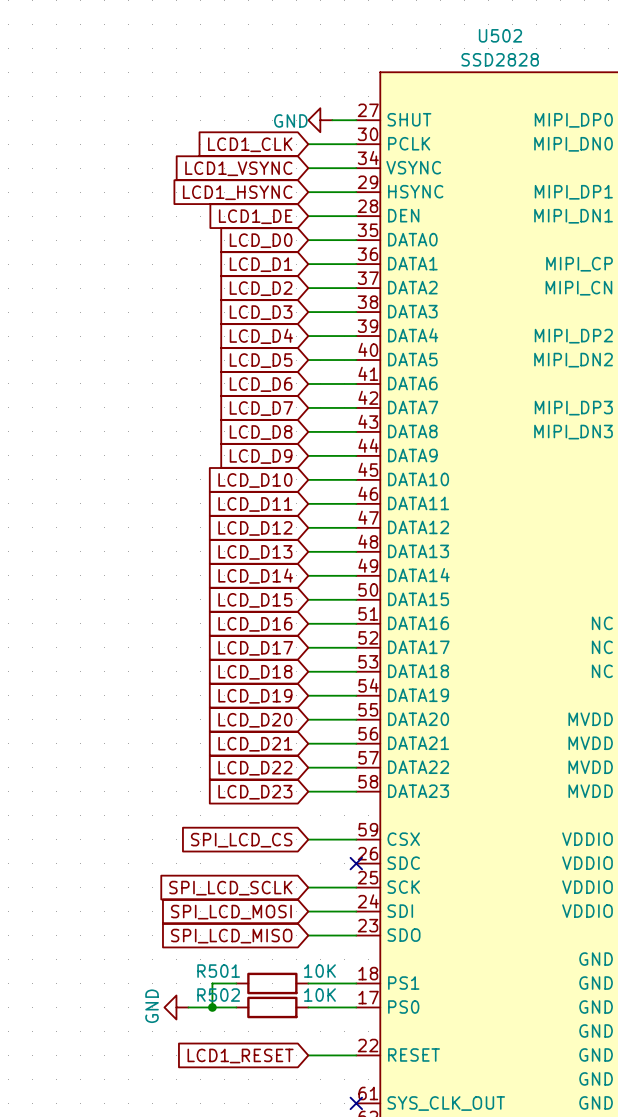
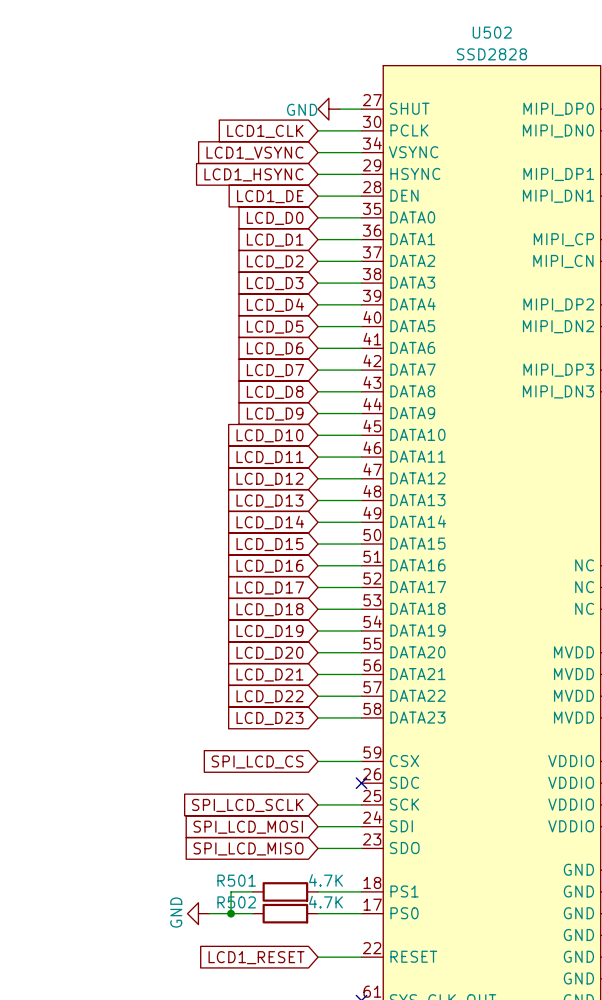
R501 value: 10K (319, 971) -> 4.7K (325, 880)
R502 value: 10K (319, 995) -> 4.7K (325, 902)

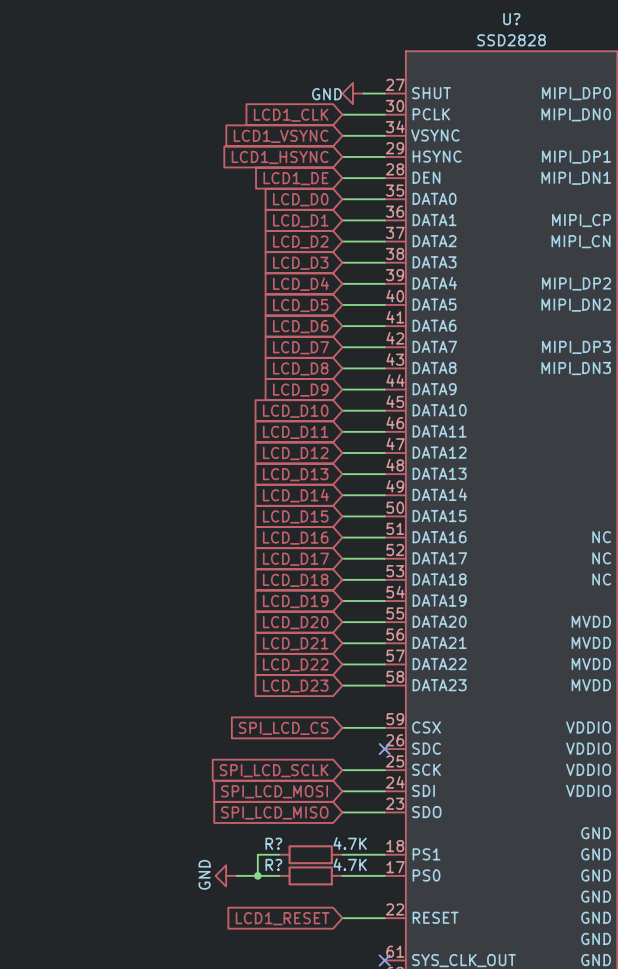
U502 name: U502 (492, 32) -> U? (511, 19)
R501 name: R501 (236, 880) -> R? (273, 843)
R502 name: R502 (236, 902) -> R? (273, 864)

